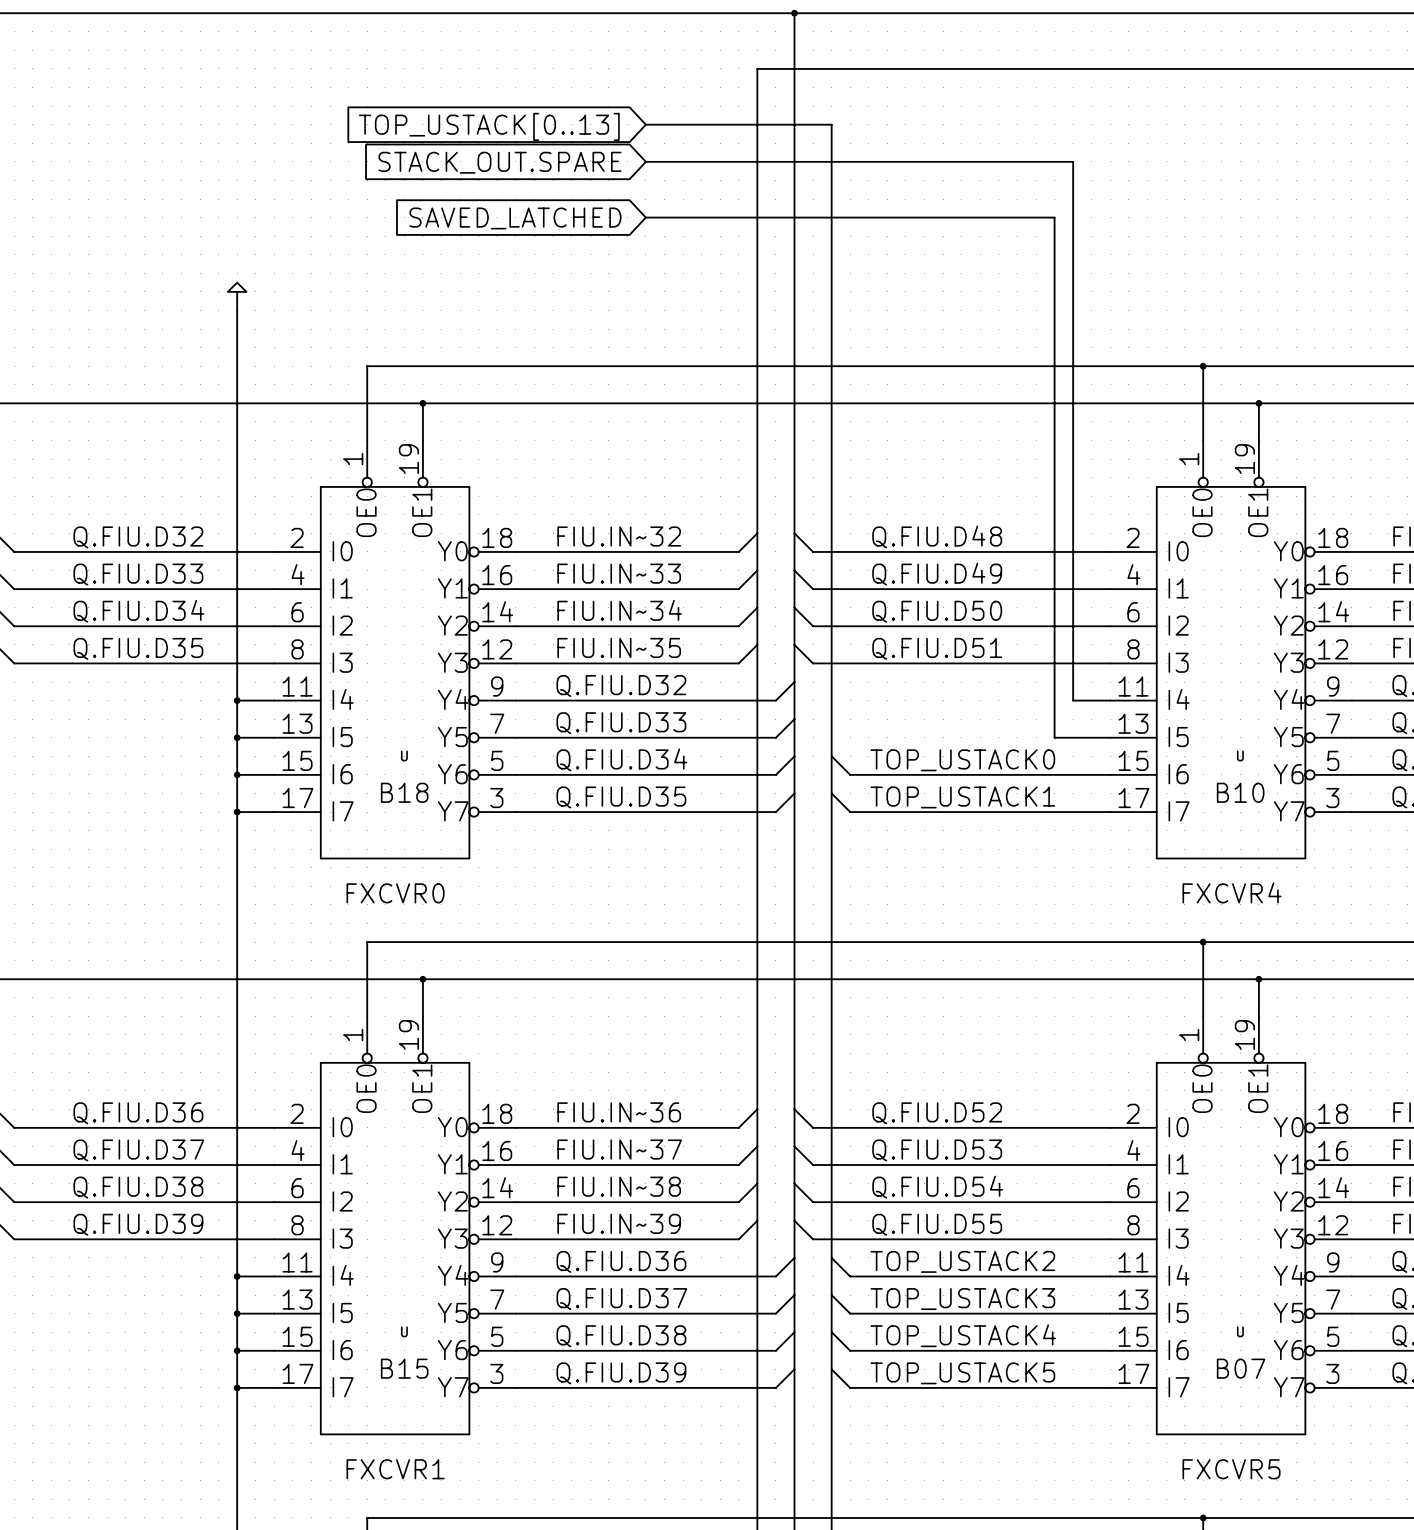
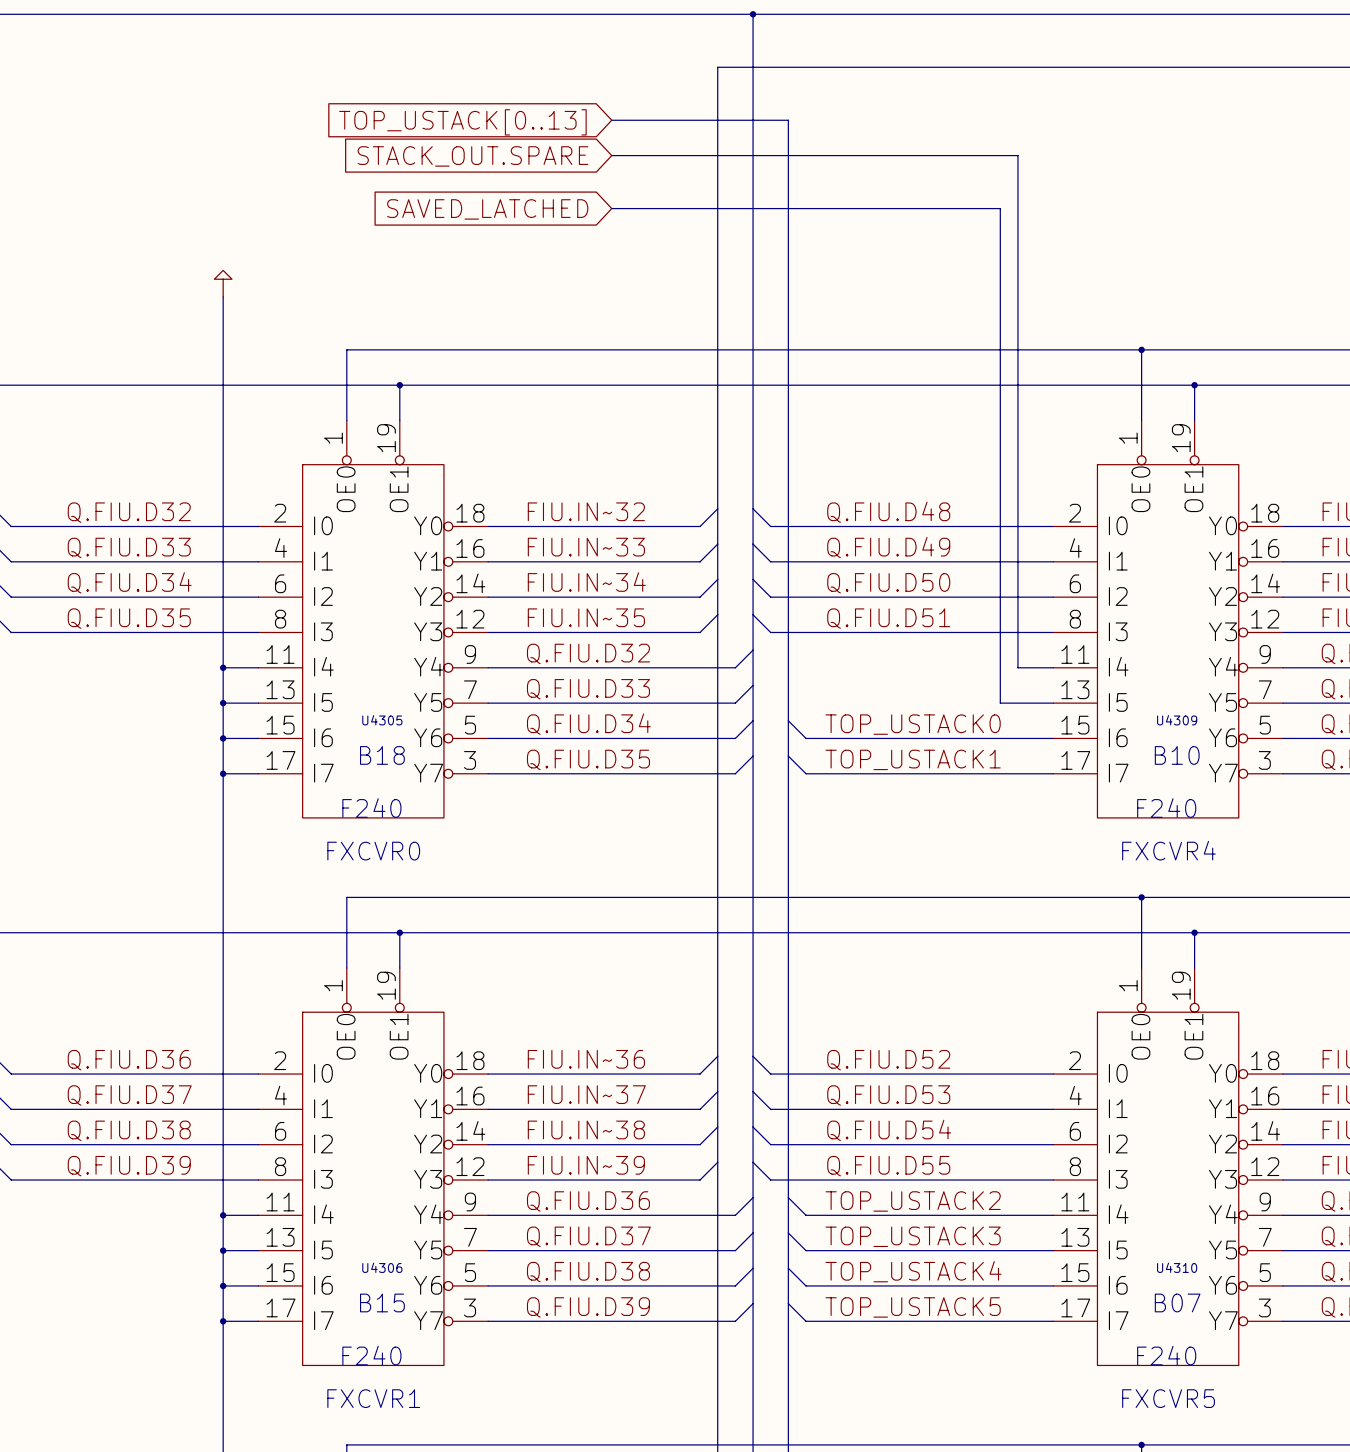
U name: U (404, 755) -> U4305 (382, 720)
U name: U (1240, 755) -> U4309 (1177, 720)
U value: none -> F240 (371, 808)
U value: none -> F240 (1166, 808)
U name: U (404, 1331) -> U4306 (382, 1267)
U name: U (1240, 1331) -> U4310 (1177, 1267)
U value: none -> F240 (371, 1355)
U value: none -> F240 (1166, 1355)

